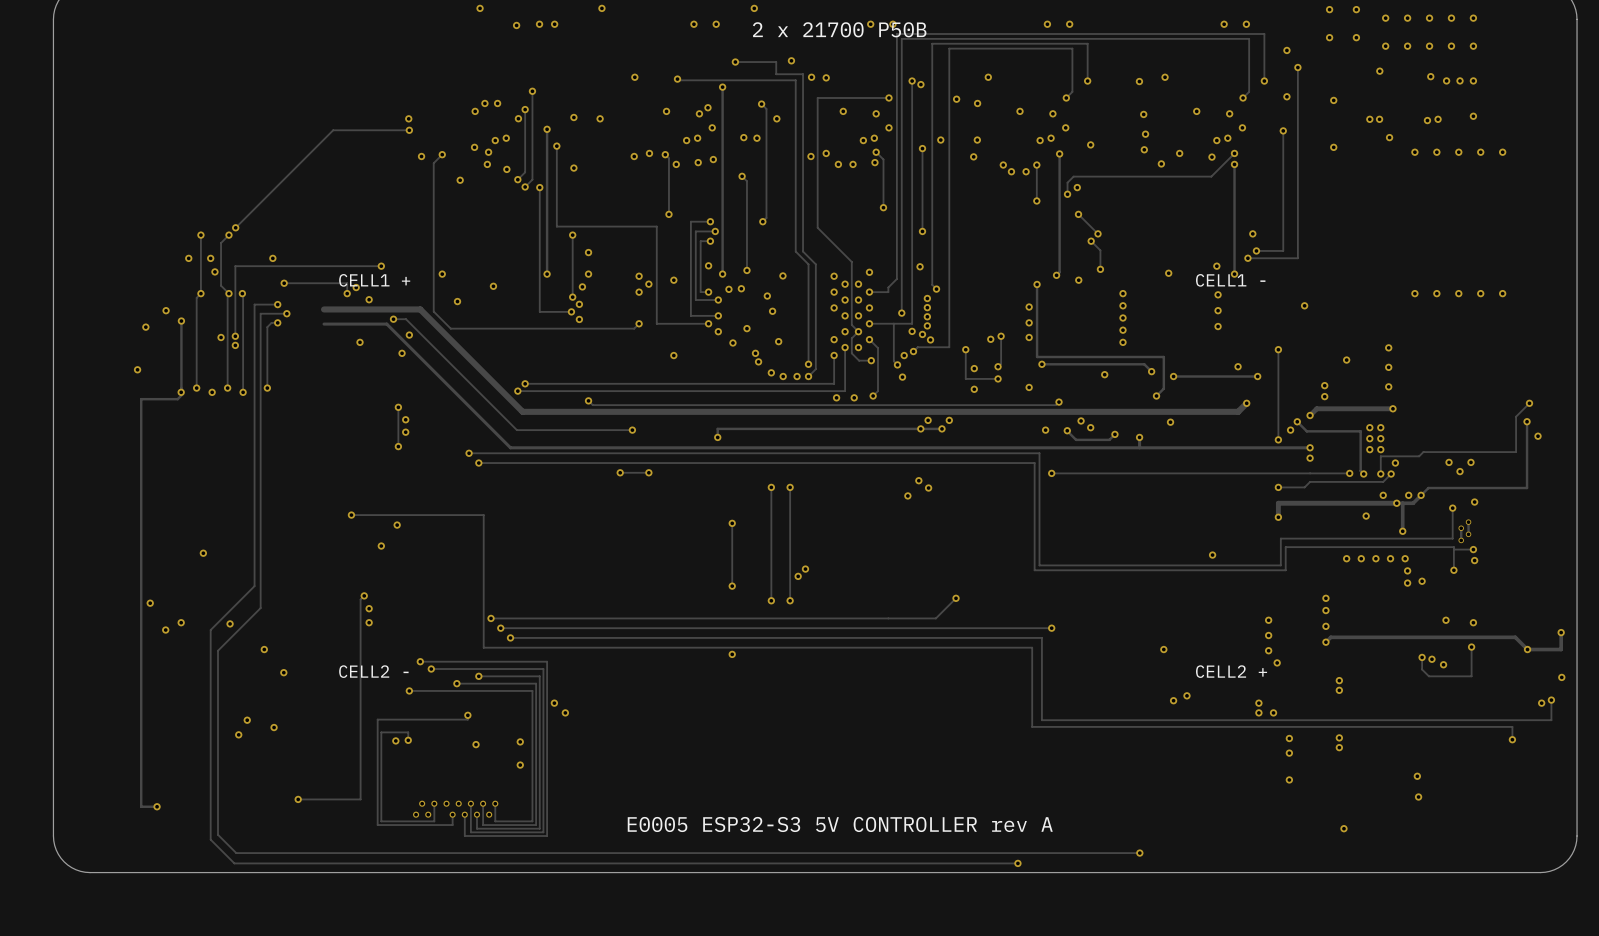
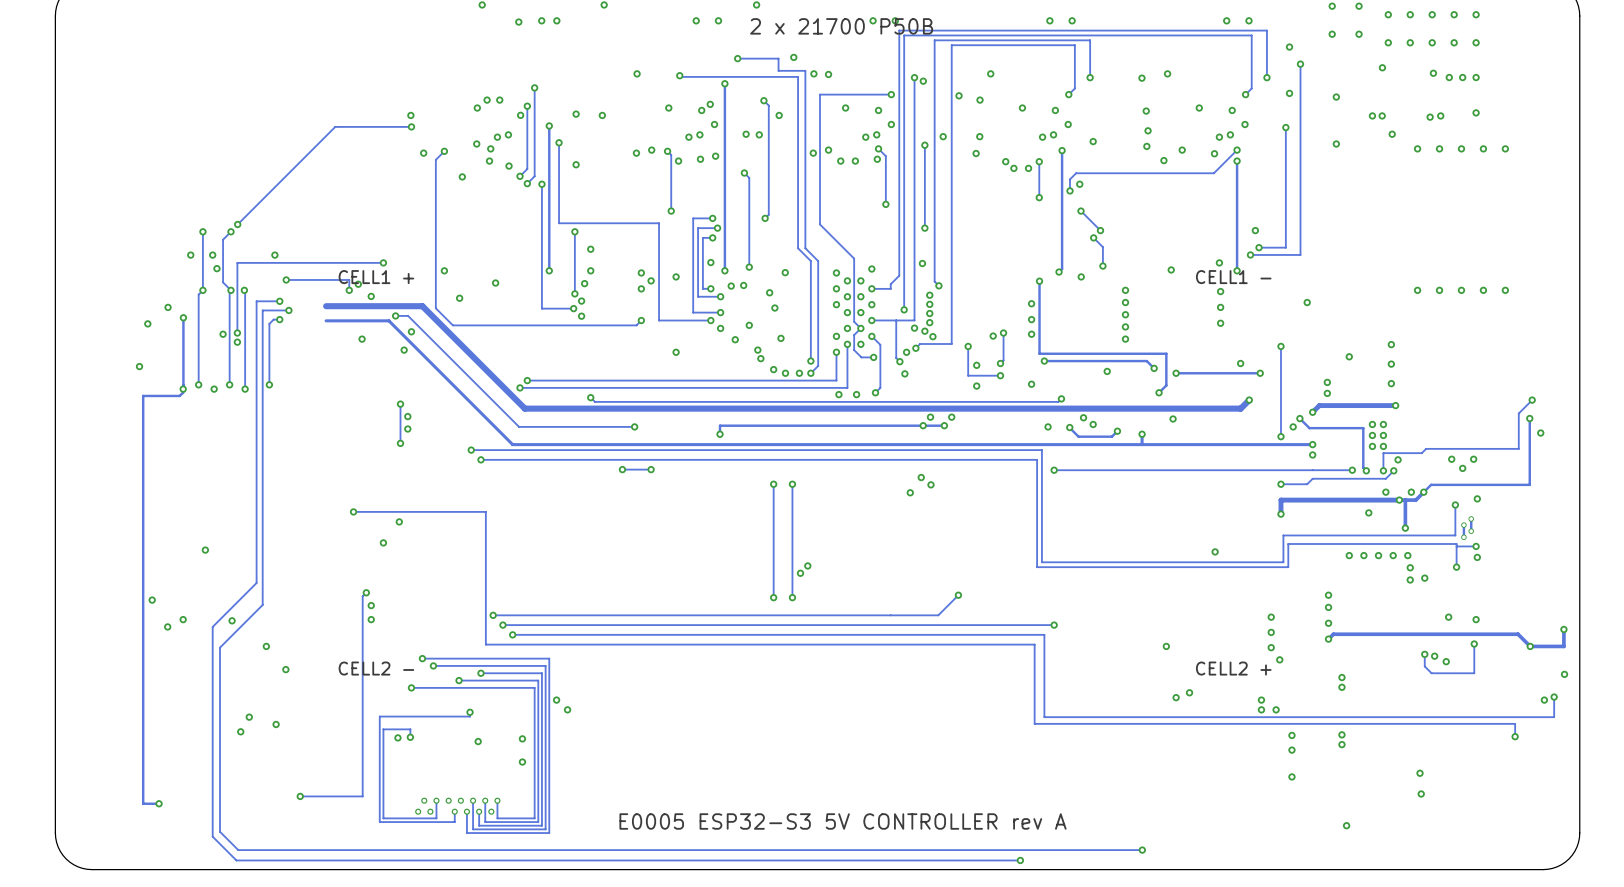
track: (732, 523) (732, 586) -> none
via: (732, 523) -> none
via: (732, 586) -> none
via: (732, 654) -> none

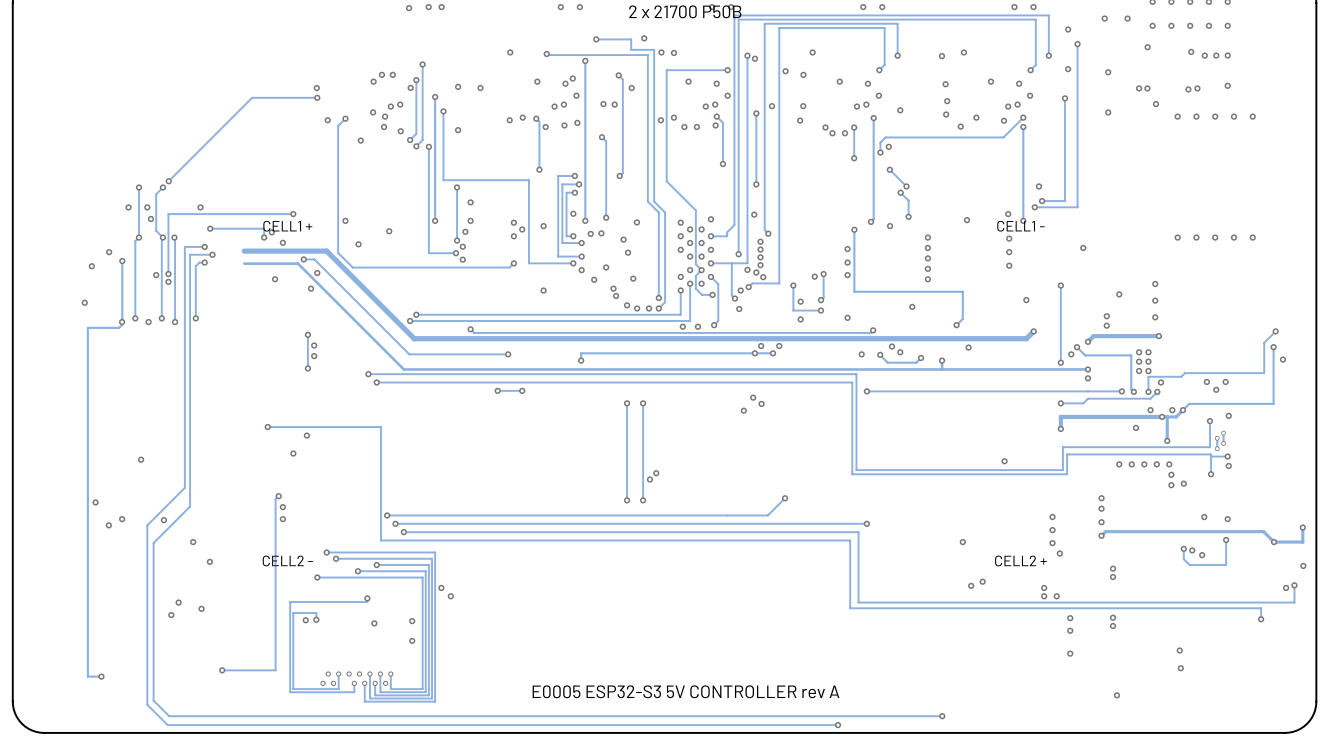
track: (1044, 361) (1146, 361) (1154, 368) -> none
via: (1044, 361) -> none
via: (1154, 368) -> none
via: (1176, 373) -> none
track: (1260, 373) (1176, 373) -> none
via: (1260, 373) -> none
via: (1327, 382) -> none
via: none -> (1106, 316)
via: (1327, 393) -> none
via: none -> (1106, 325)

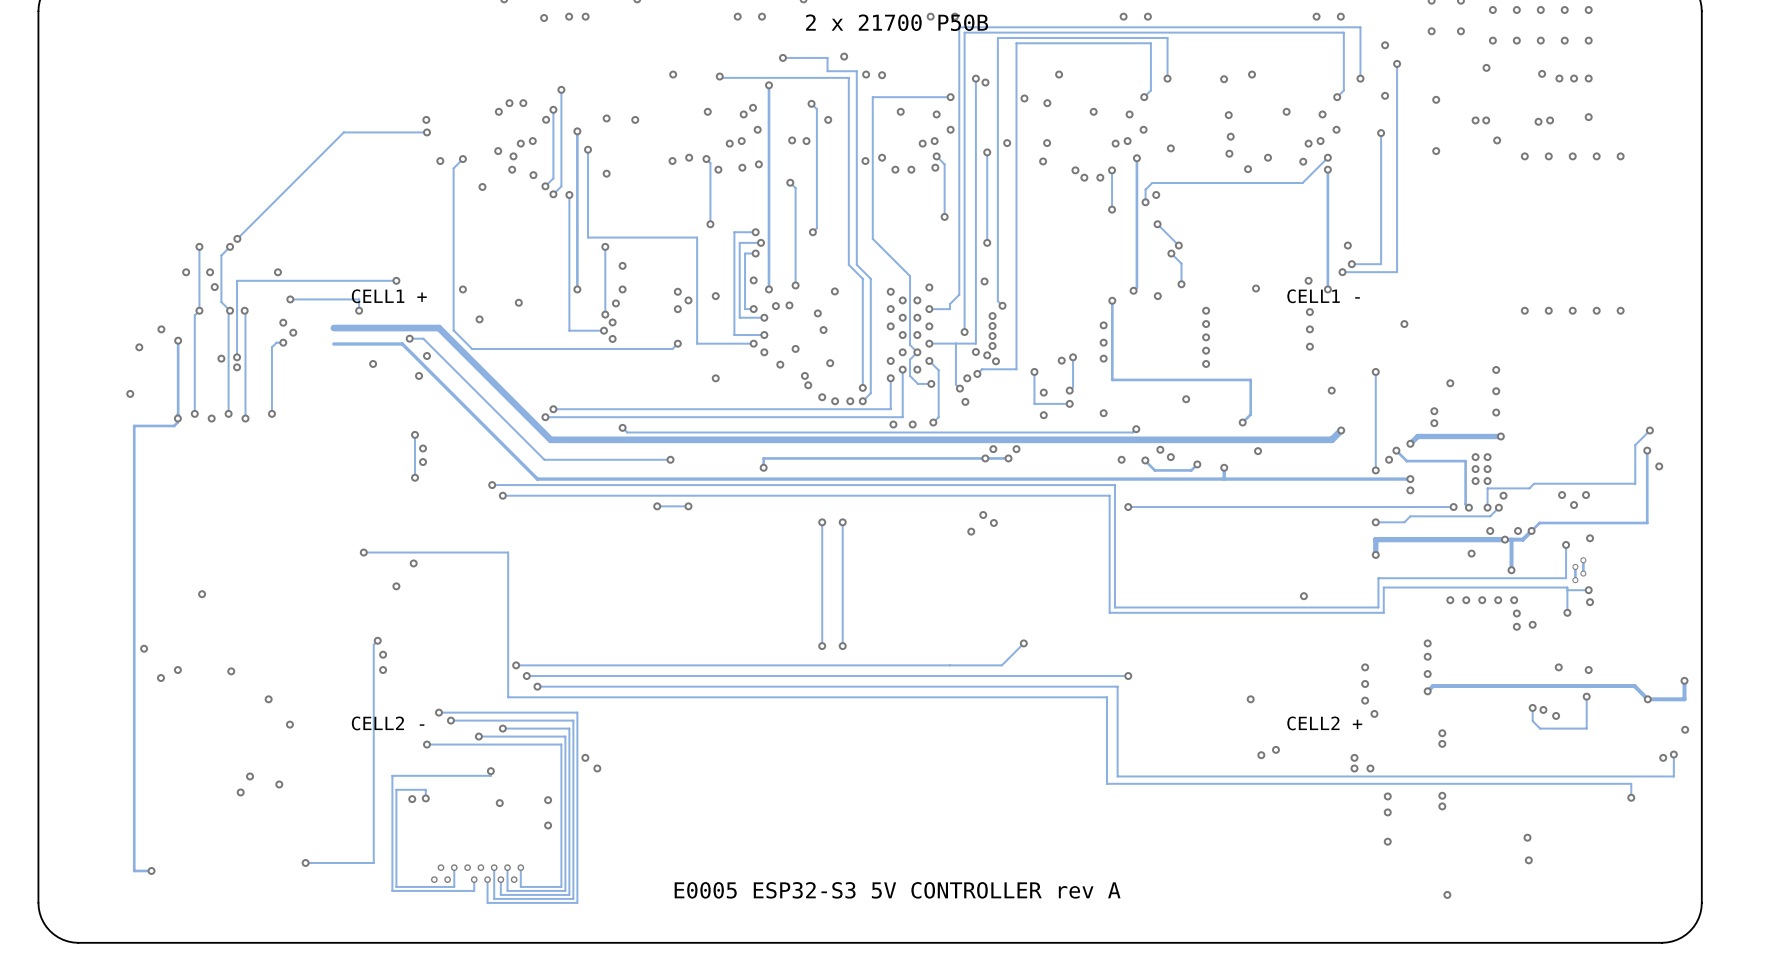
via: (271, 232) -> none
via: (282, 242) -> none
track: (204, 246) (184, 246) (184, 487) (147, 525) (147, 704) (167, 725) (838, 725) -> none
track: (212, 254) (190, 254) (190, 506) (153, 543) (153, 700) (169, 716) (942, 716) -> none
via: (656, 473) -> none
via: (649, 479) -> none
via: (942, 716) -> none
via: (838, 725) -> none

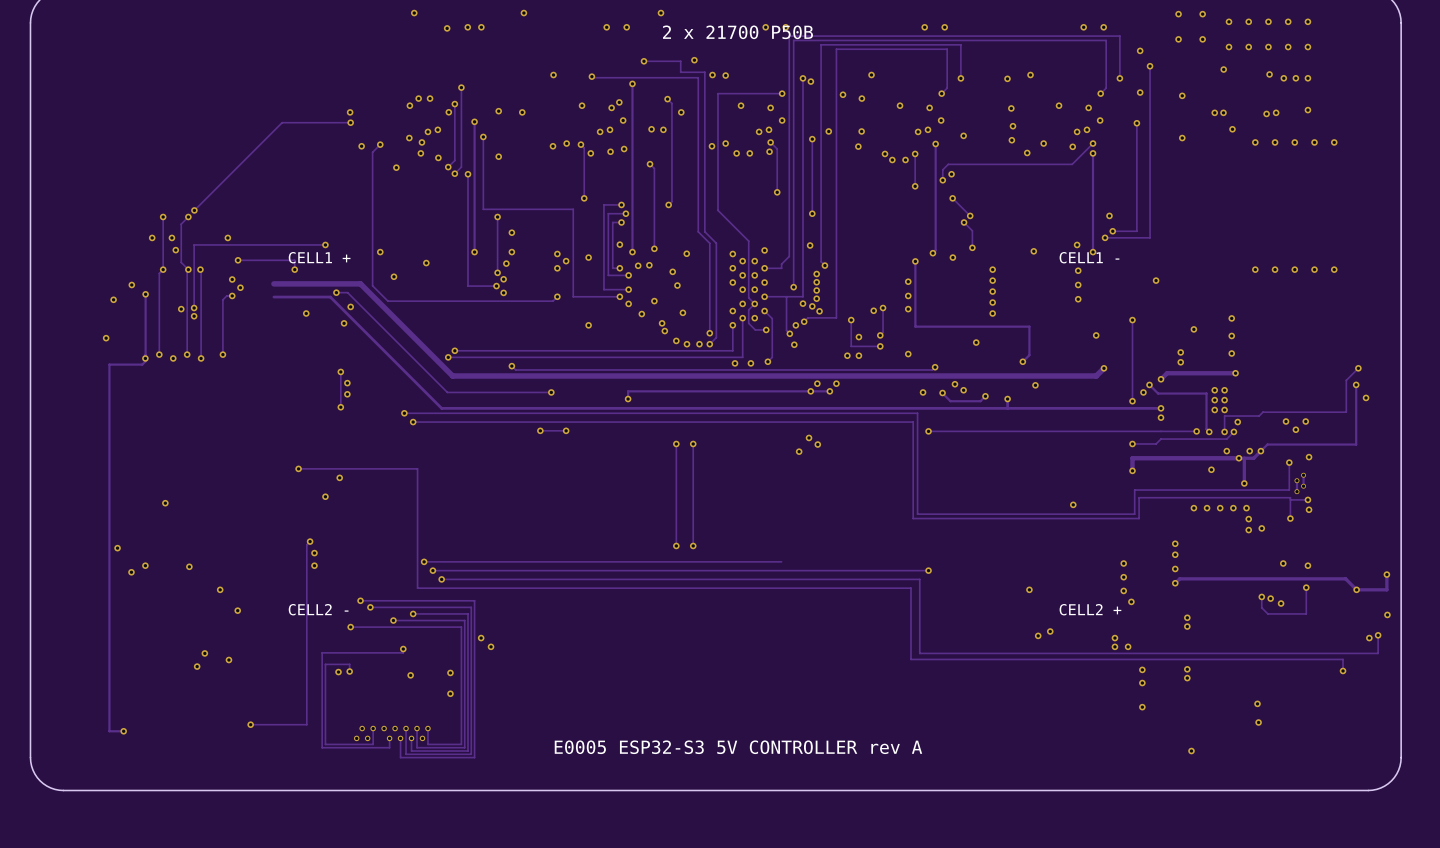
via: none -> (847, 355)
track: (1023, 643) (1001, 665) (949, 665) -> none
via: (1023, 643) -> none

